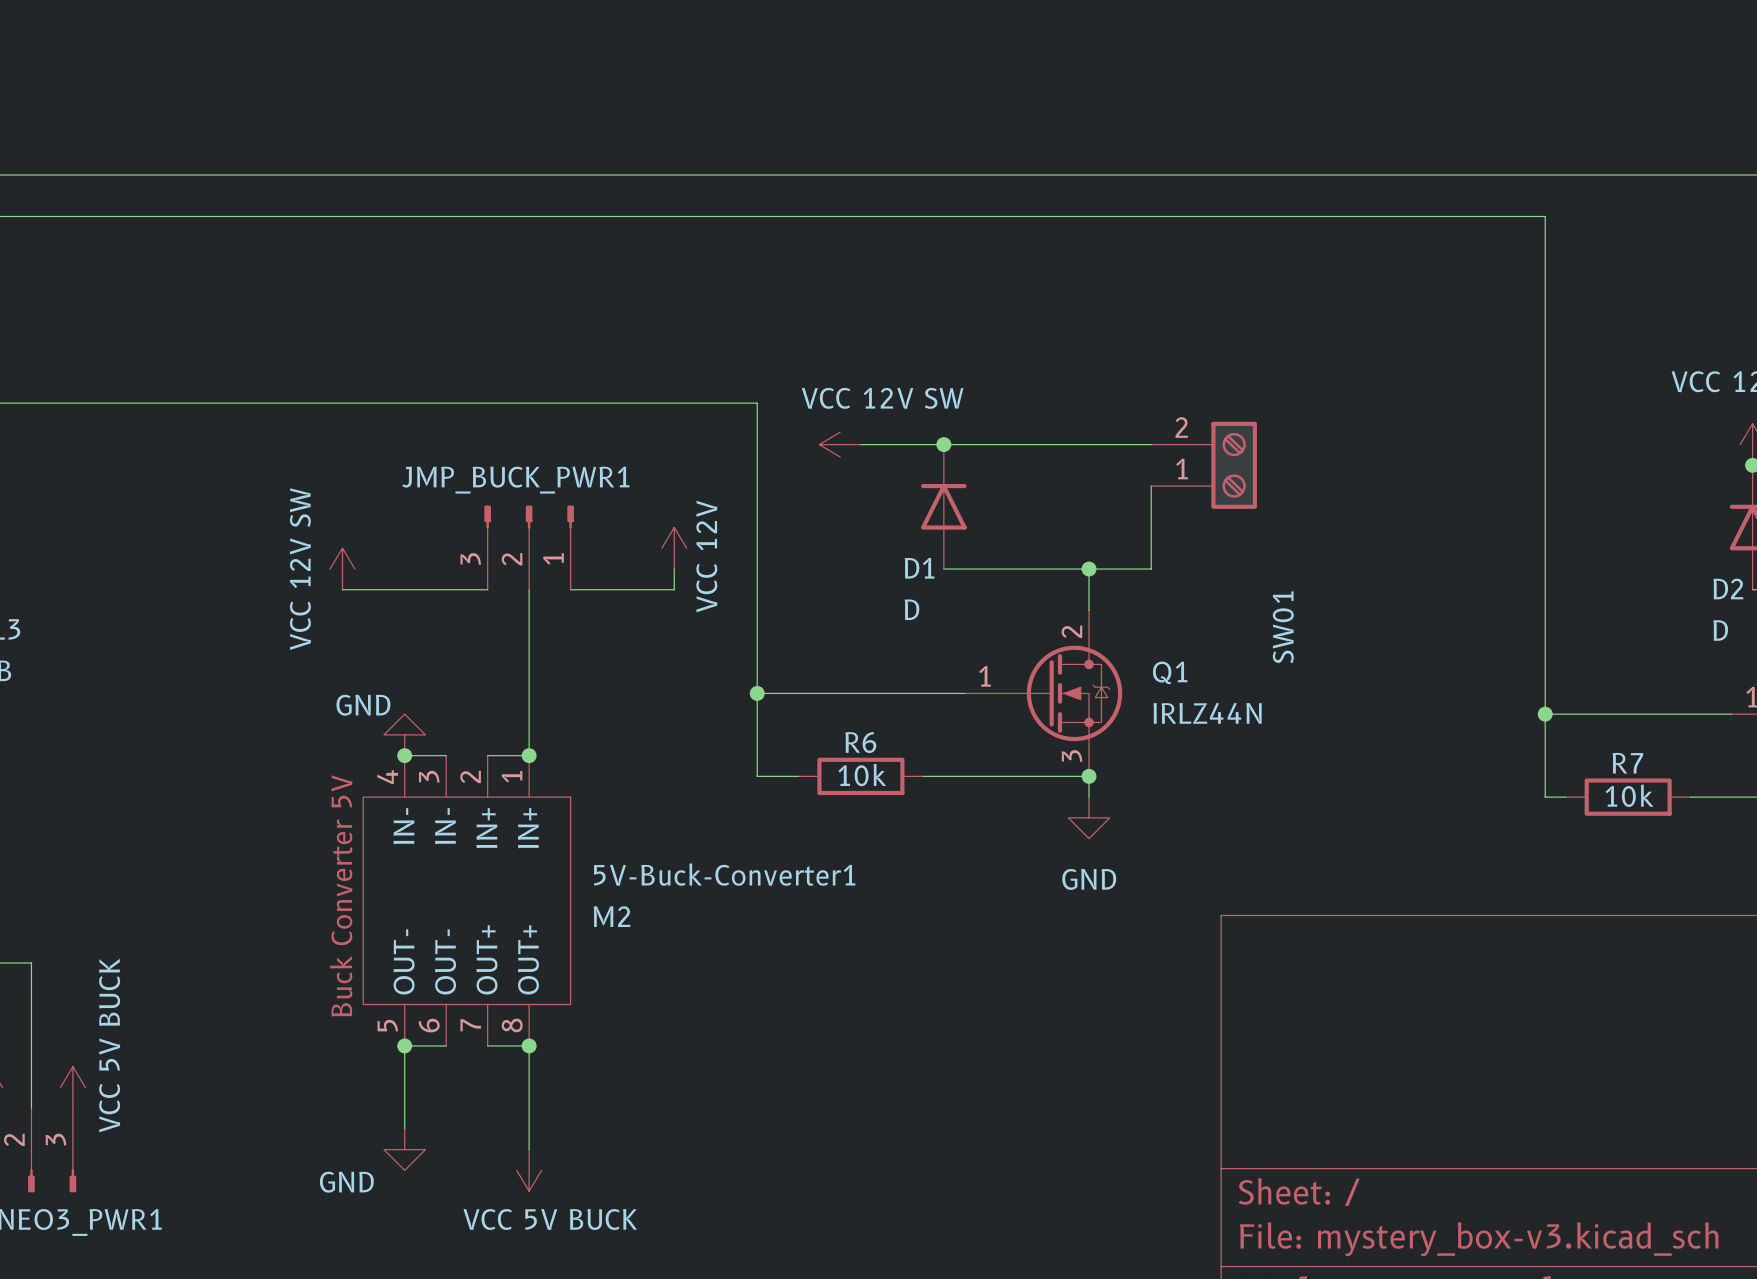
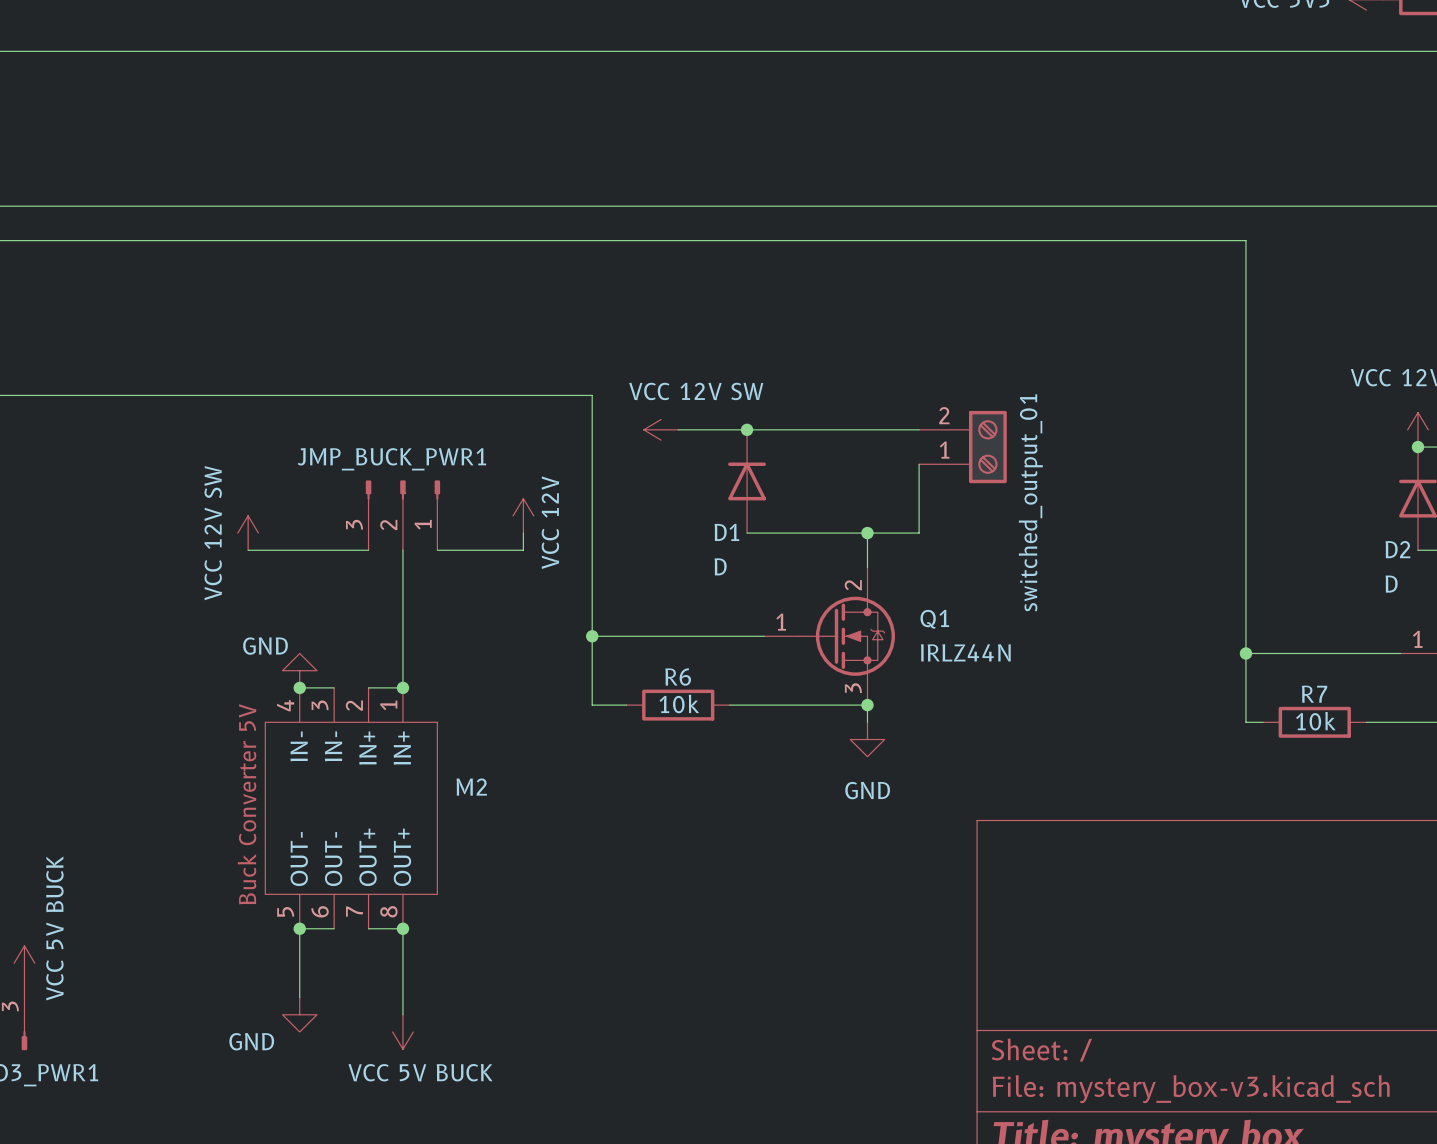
SW01 name: SW01 (1283, 627) -> switched_output_01 (1030, 502)
5V-Buck-Converter1 name: 5V-Buck-Converter1 (724, 874) -> M2 (471, 787)
5V-Buck-Converter1 value: M2 (611, 916) -> none

